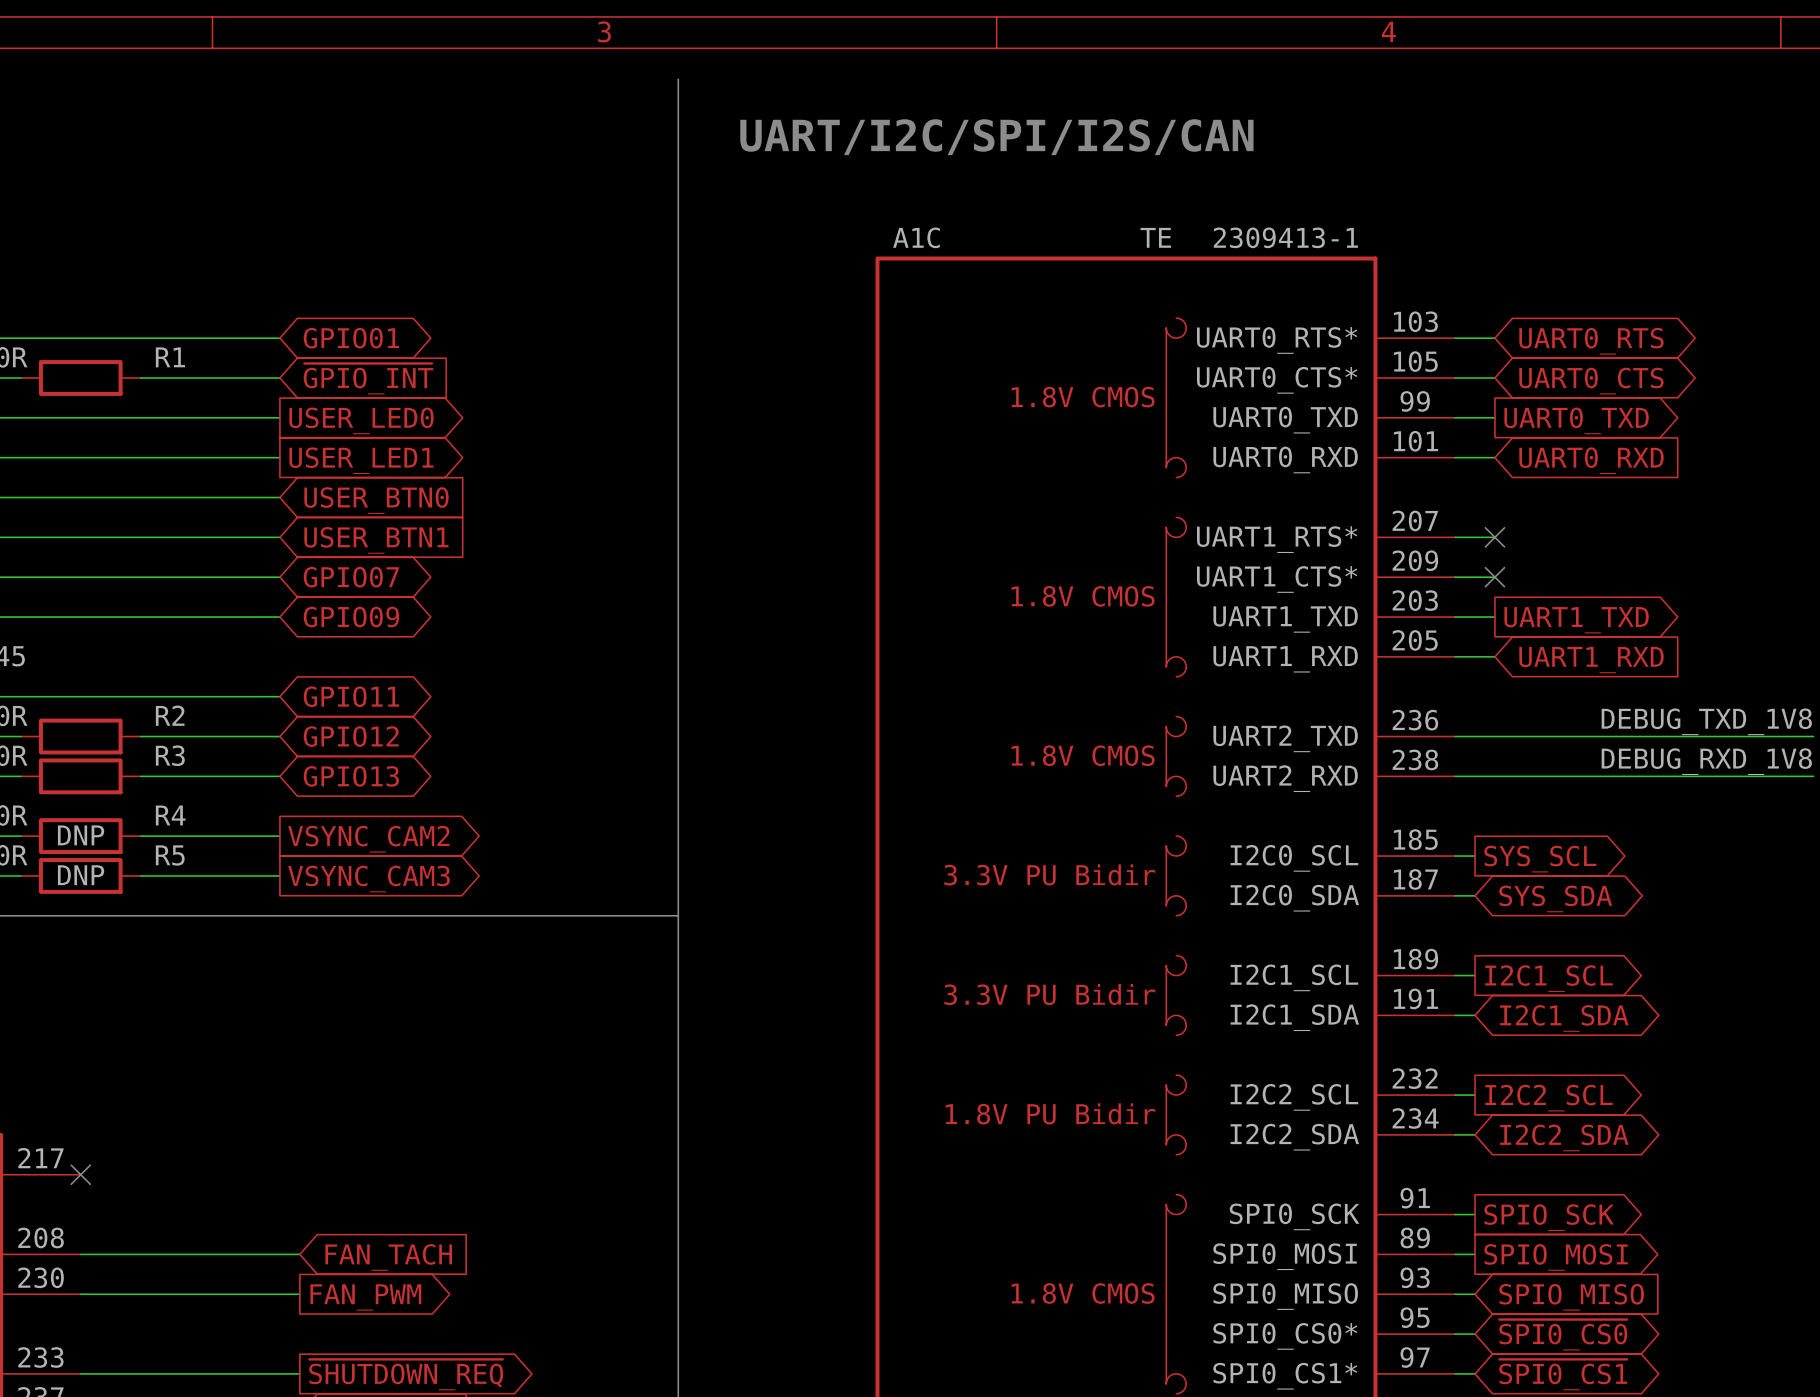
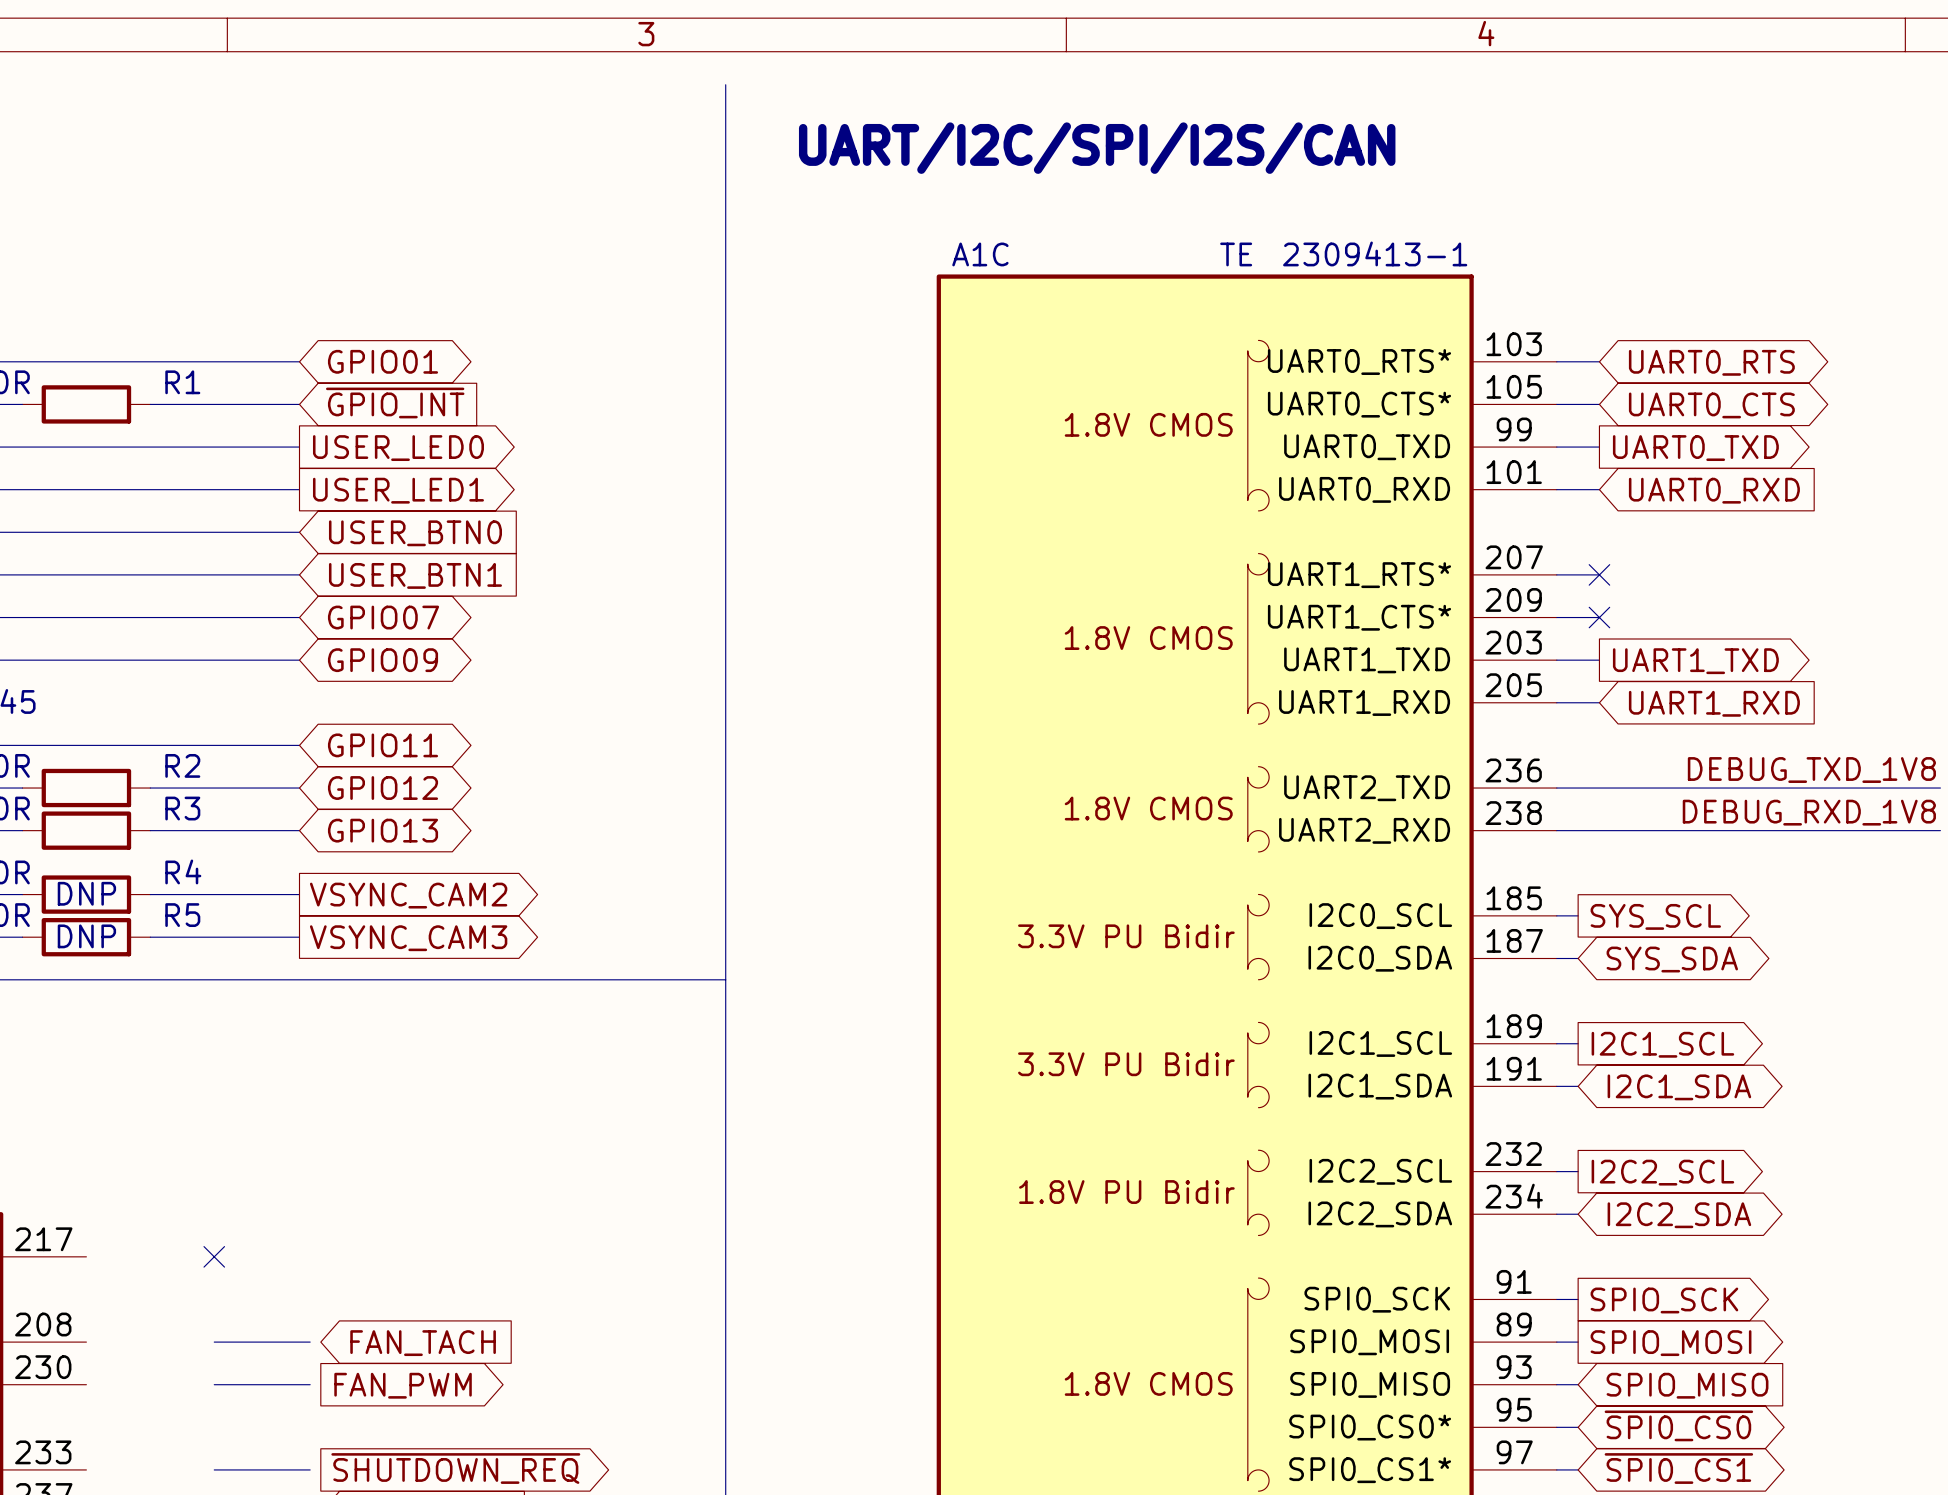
no-connect mark: (80, 1174) -> none
no-connect mark: none -> (214, 1256)
wire: (80, 1254) (200, 1254) -> none
wire: (289, 1254) (299, 1254) -> none
wire: (80, 1294) (200, 1294) -> none
wire: (289, 1294) (299, 1294) -> none
wire: (80, 1373) (200, 1373) -> none
wire: (289, 1373) (299, 1373) -> none

